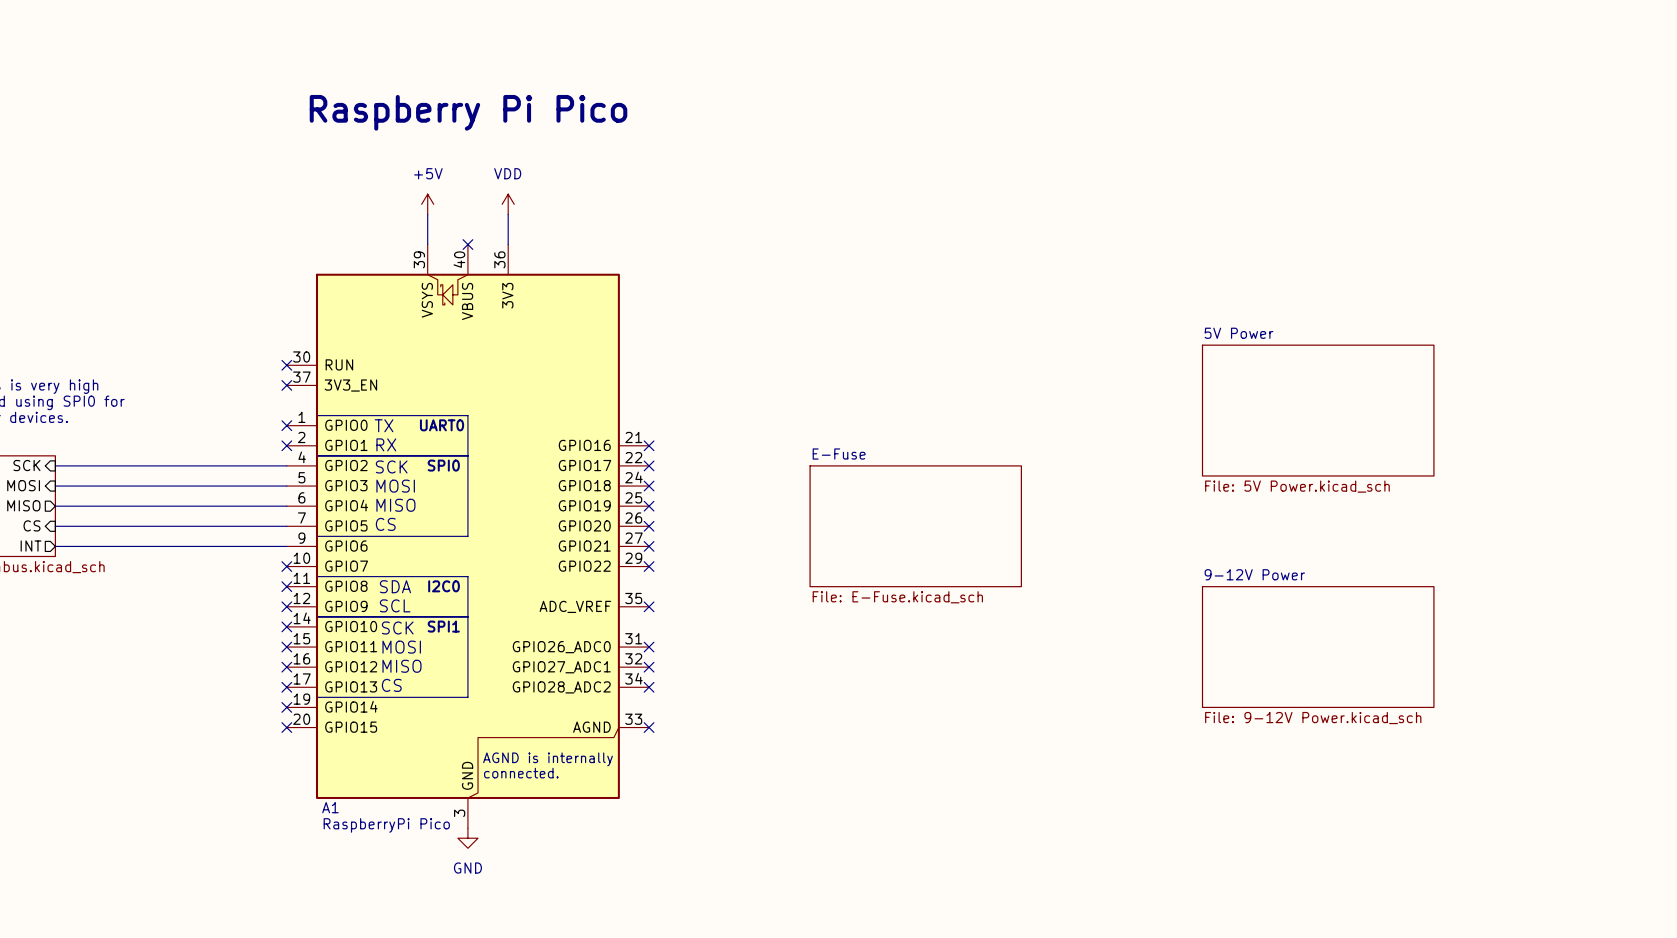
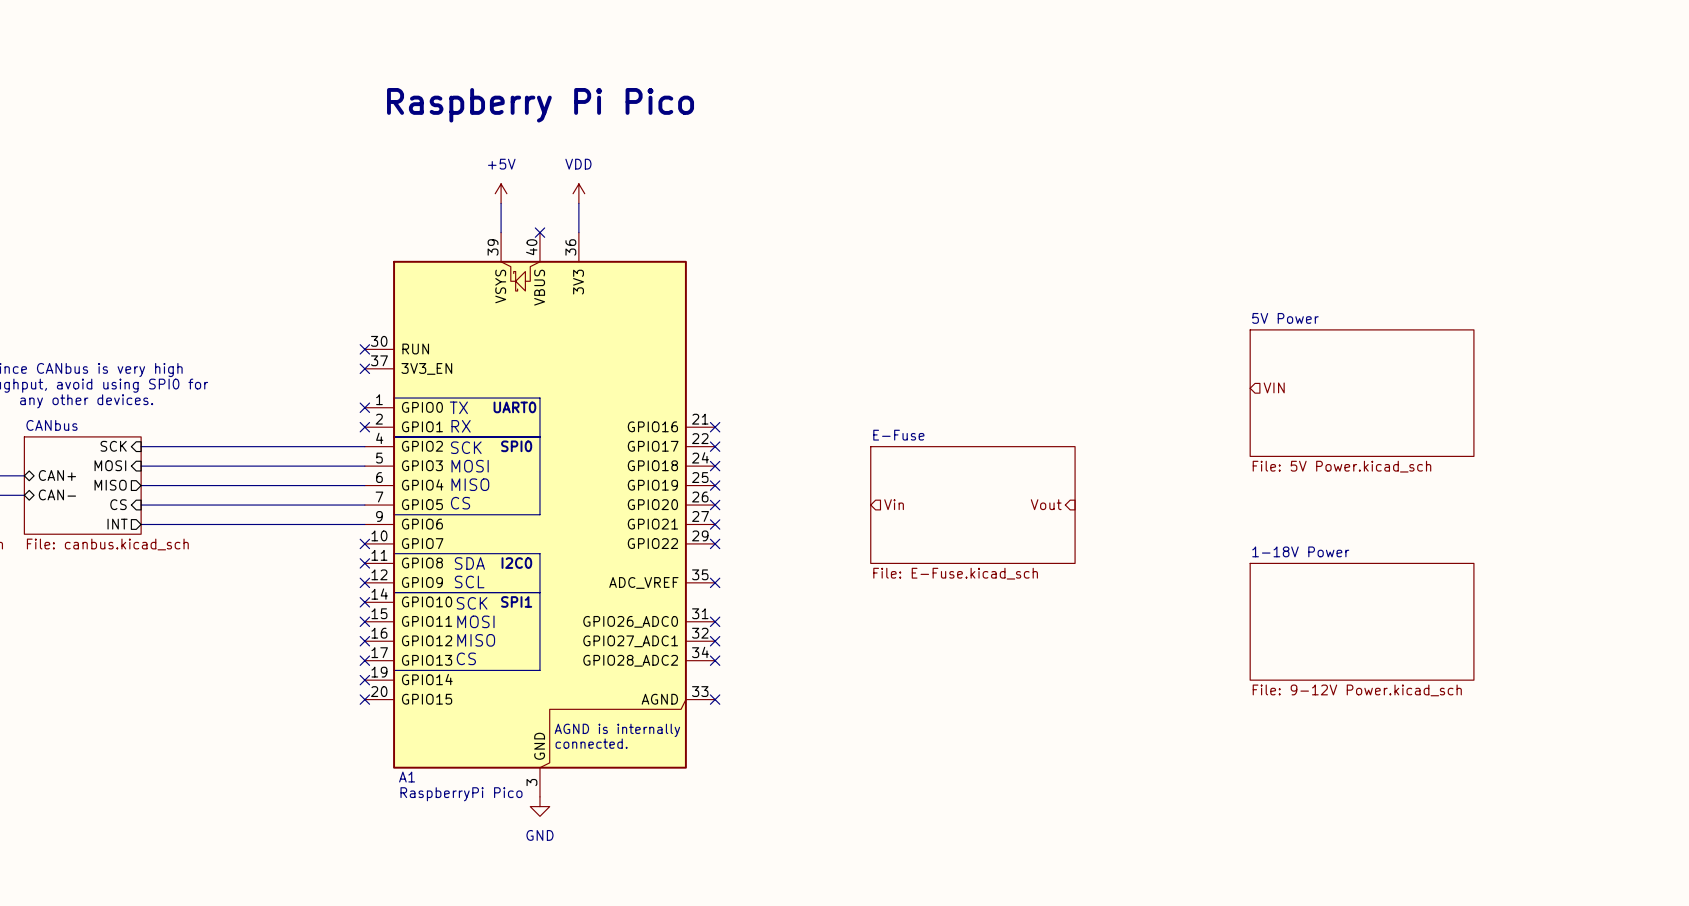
hierarchical label: none -> VIN (1274, 387)
hierarchical label: none -> Vin (894, 504)
hierarchical label: none -> Vout (1046, 504)
sheet 9-12V Power name: 9-12V Power (1254, 574) -> 1-18V Power (1300, 551)

